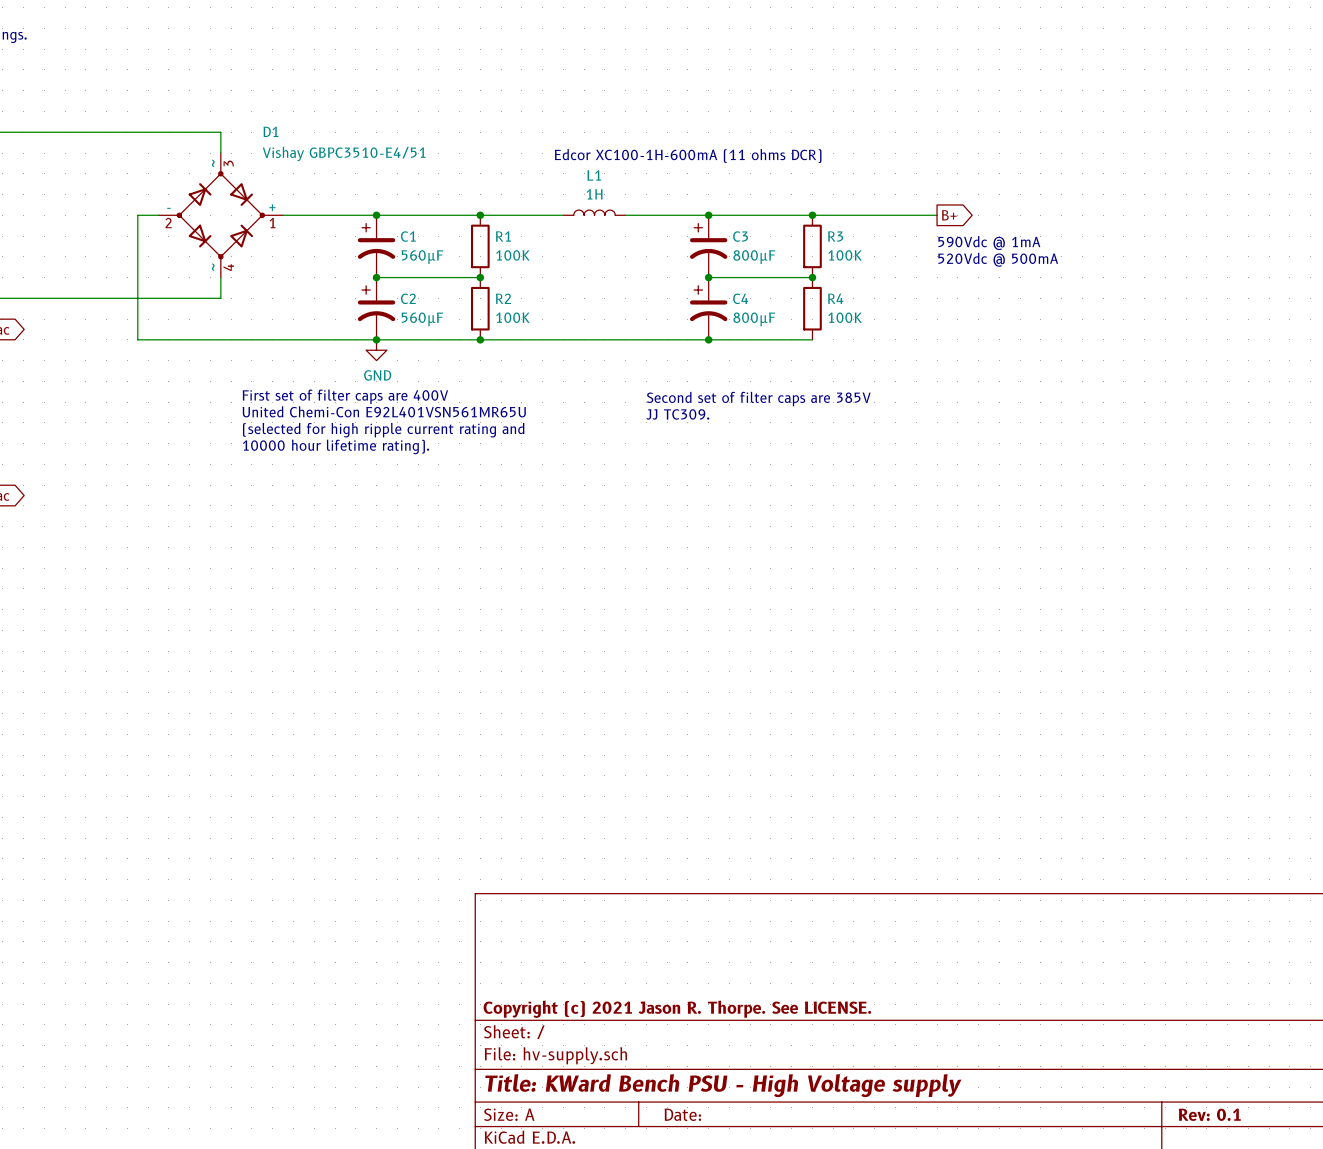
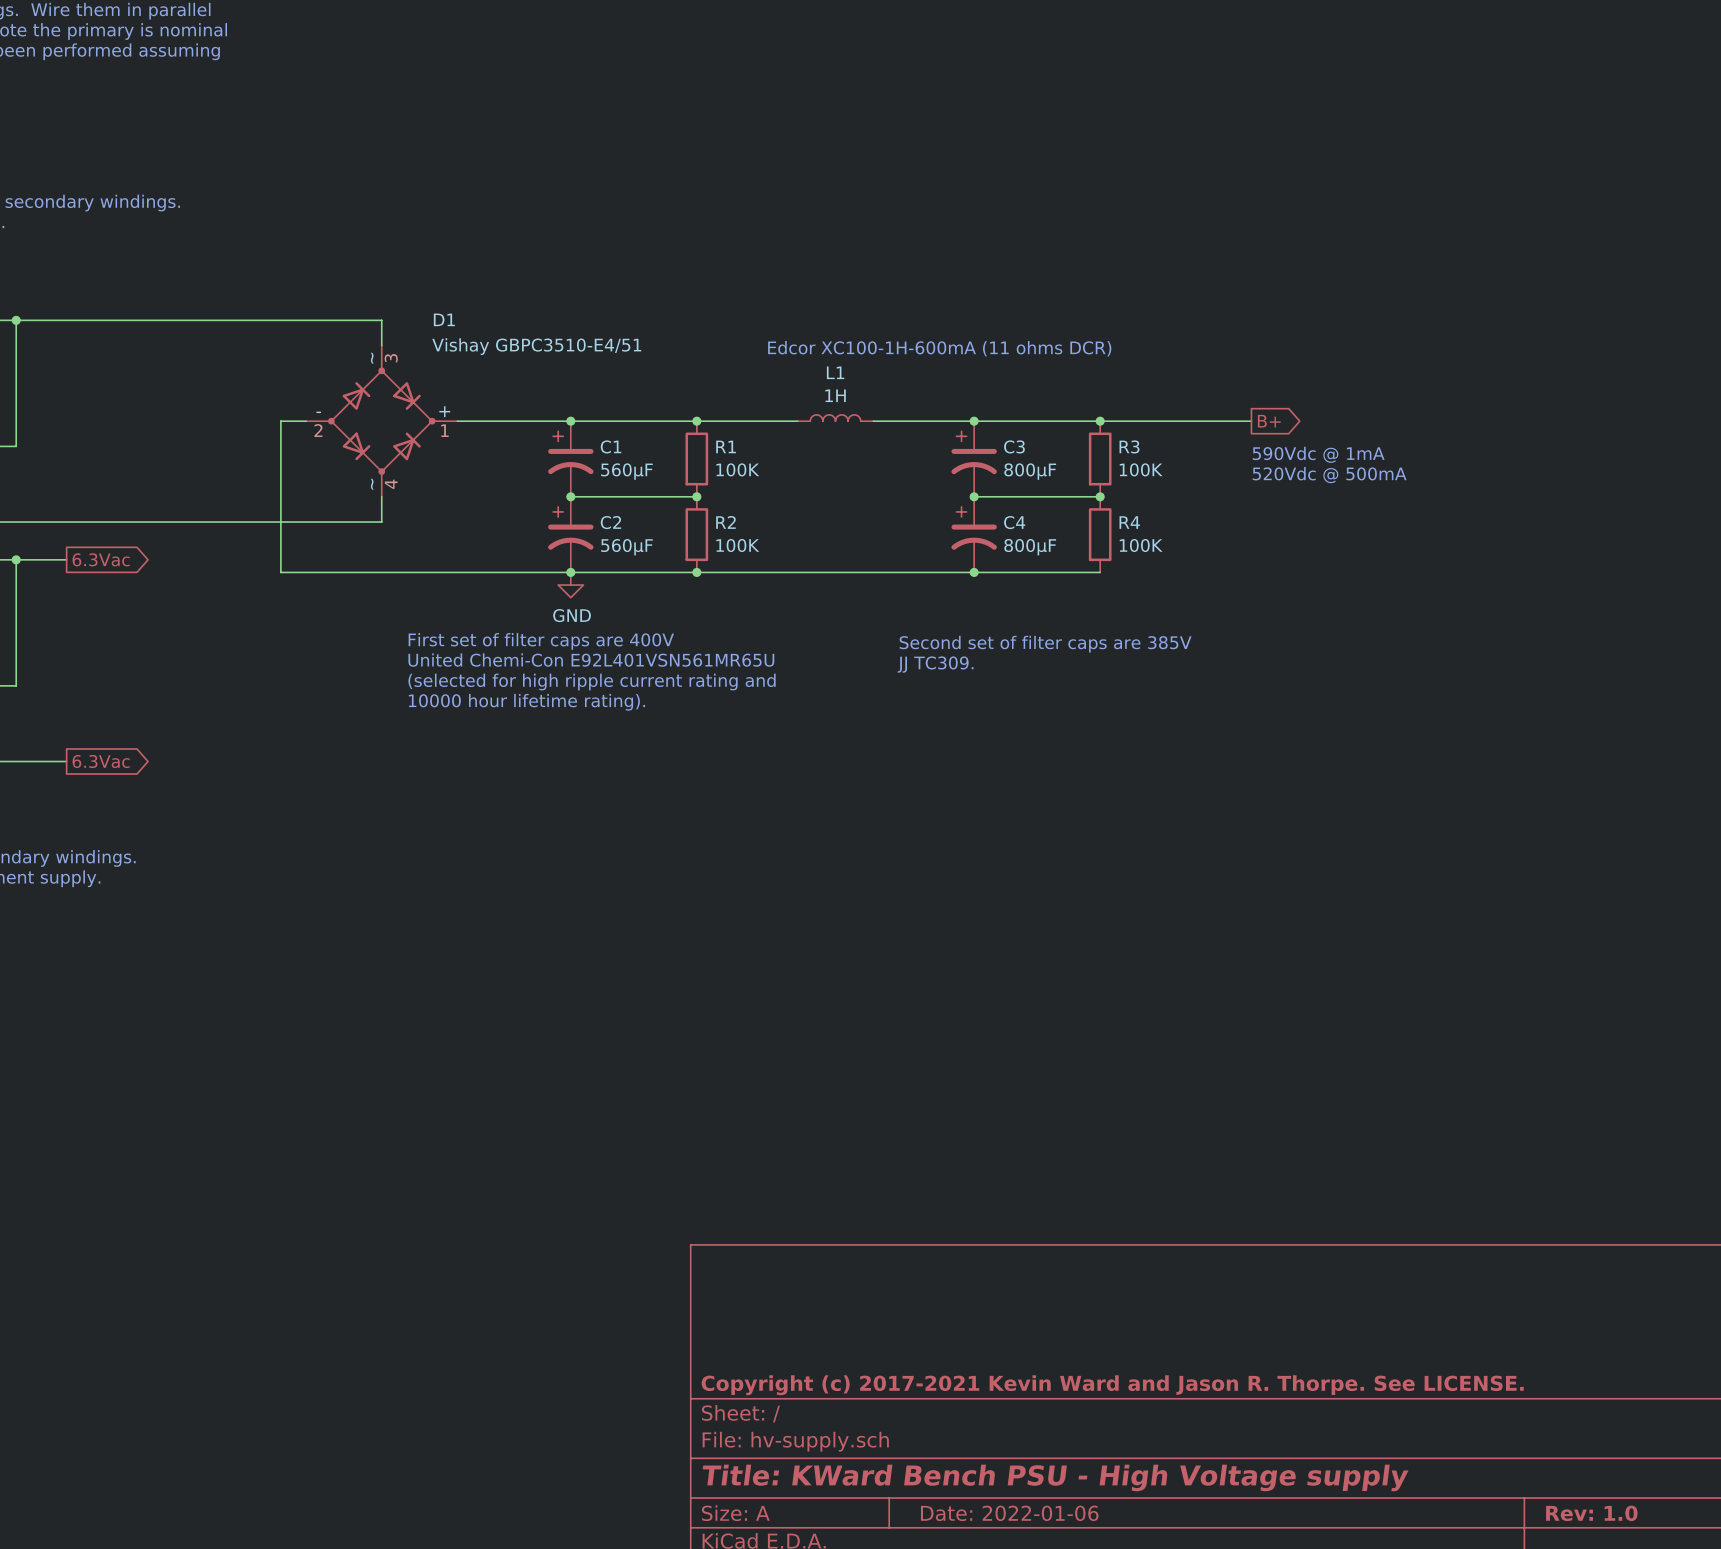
title block: Copyright (c) 2021 Jason R. Thorpe. See LICENSE. (677, 1009) -> Copyright (c) 2017-2021 Kevin Ward and Jason R. Thorpe. See LICENSE. (1112, 1385)
title block: Date: (682, 1114) -> Date: 2022-01-06 (1009, 1513)
title block: Rev: 0.1 (1209, 1114) -> Rev: 1.0 (1591, 1513)

